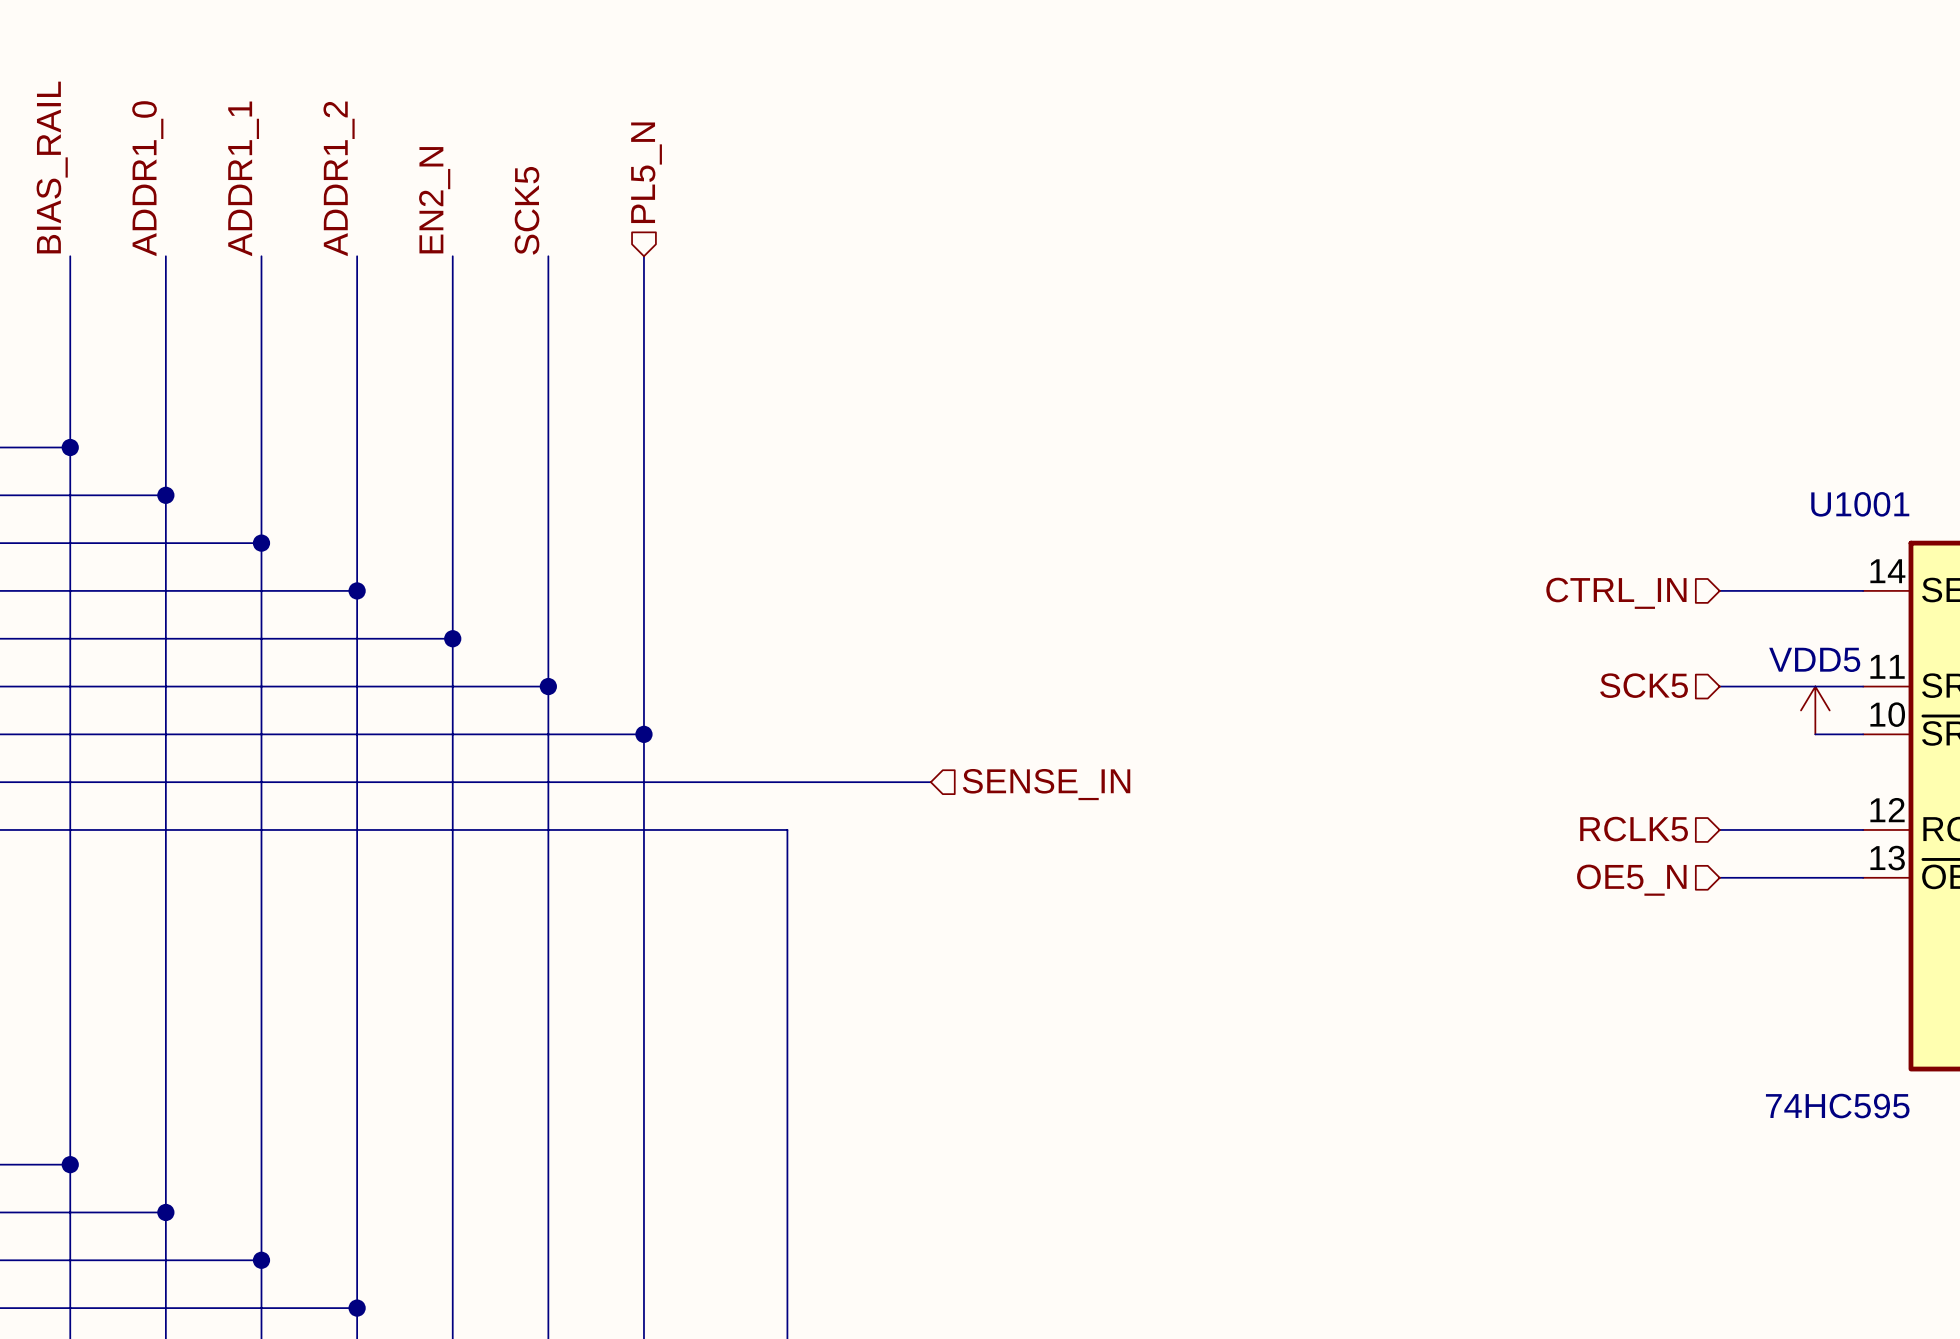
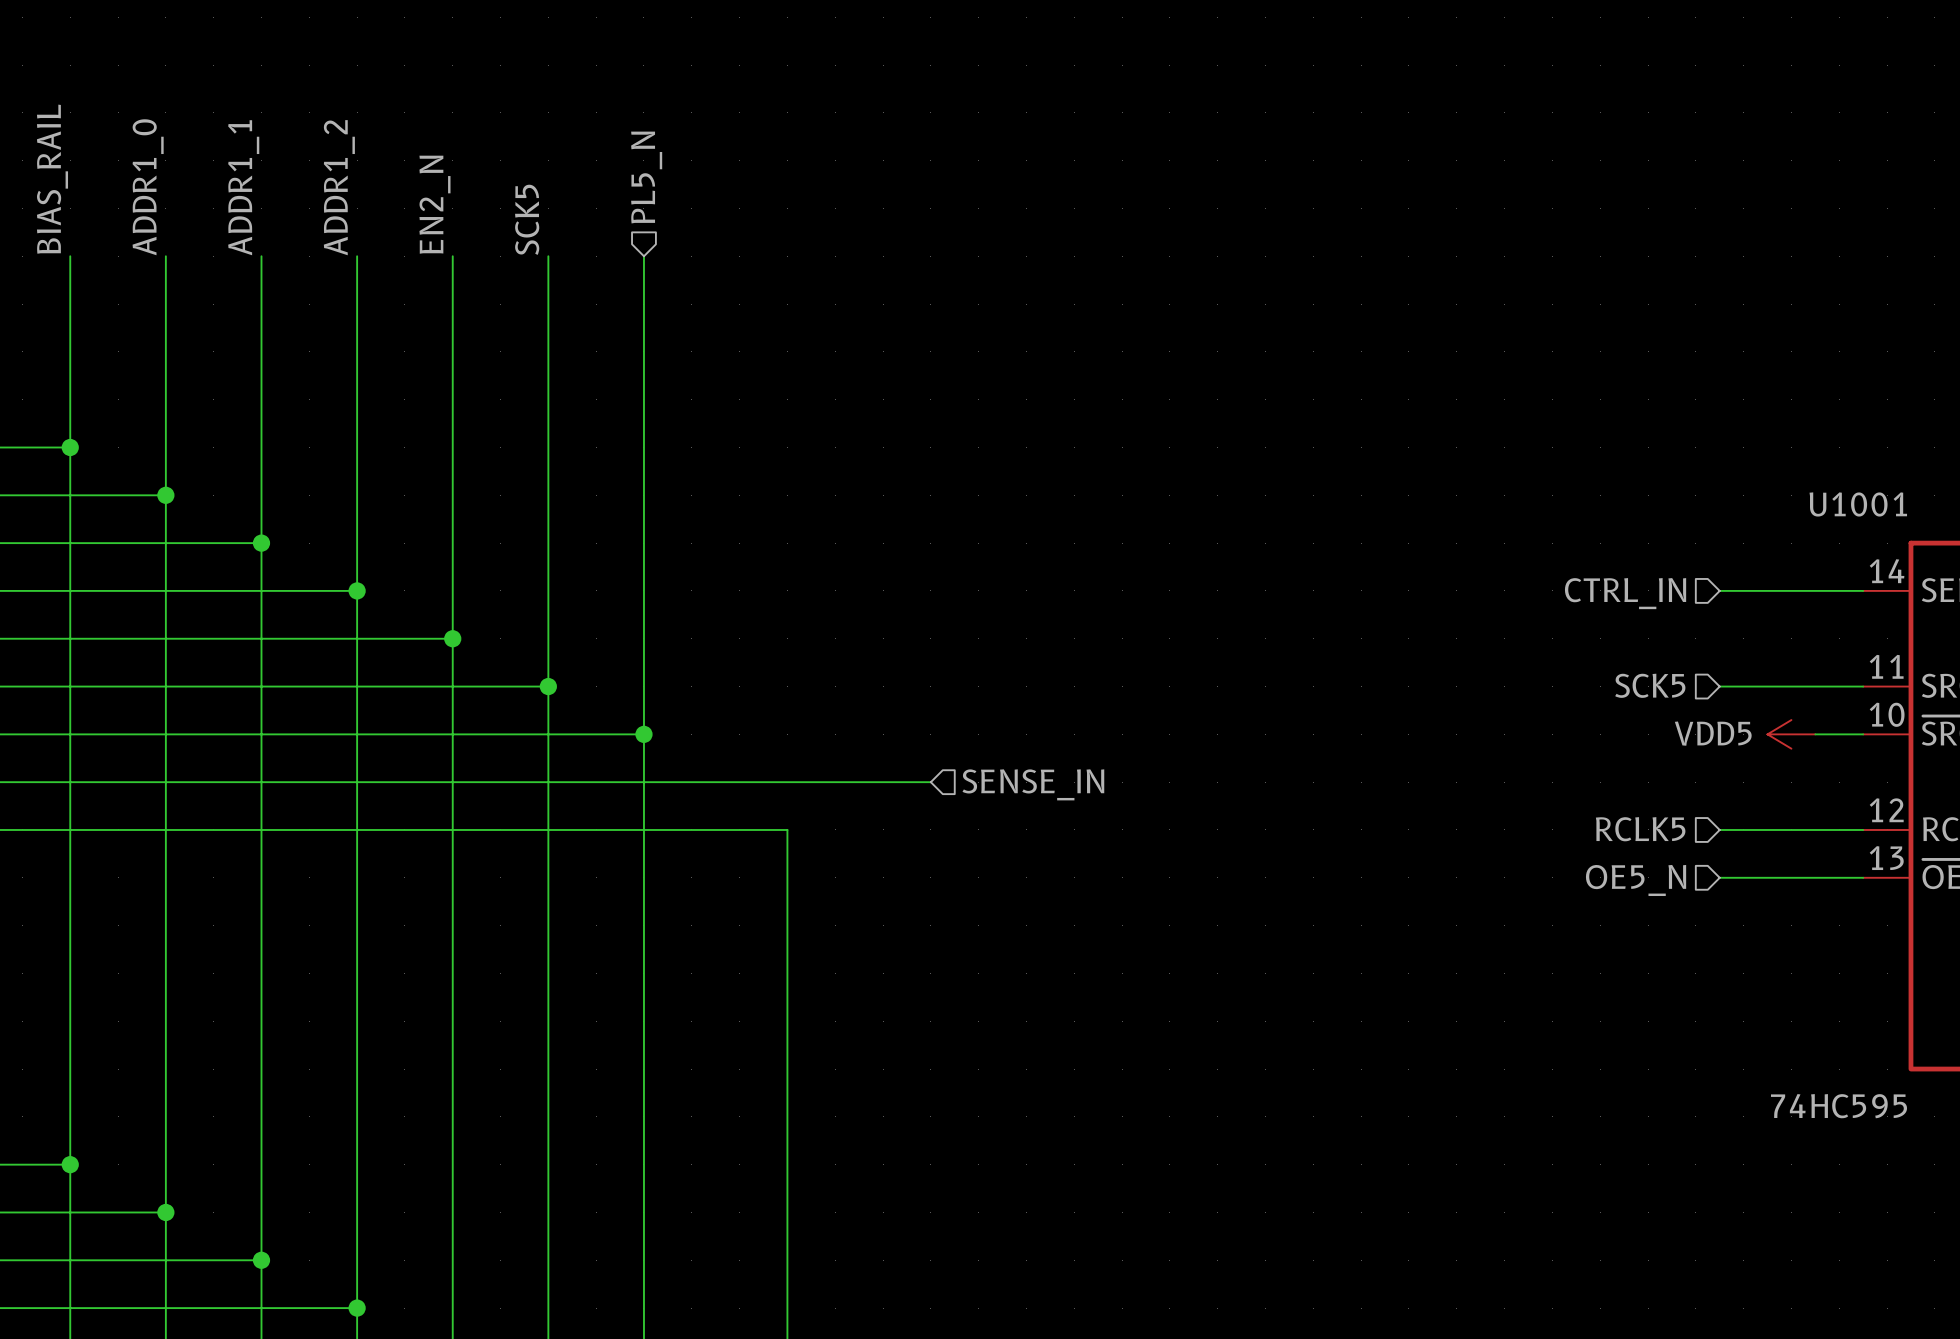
power symbol text position: VDD5 (1814, 659) -> VDD5 (1713, 733)
power symbol rotation: 0° (1815, 710) -> 90° counterclockwise (1791, 734)
power symbol position: VDD5 (1815, 710) -> VDD5 (1791, 734)

